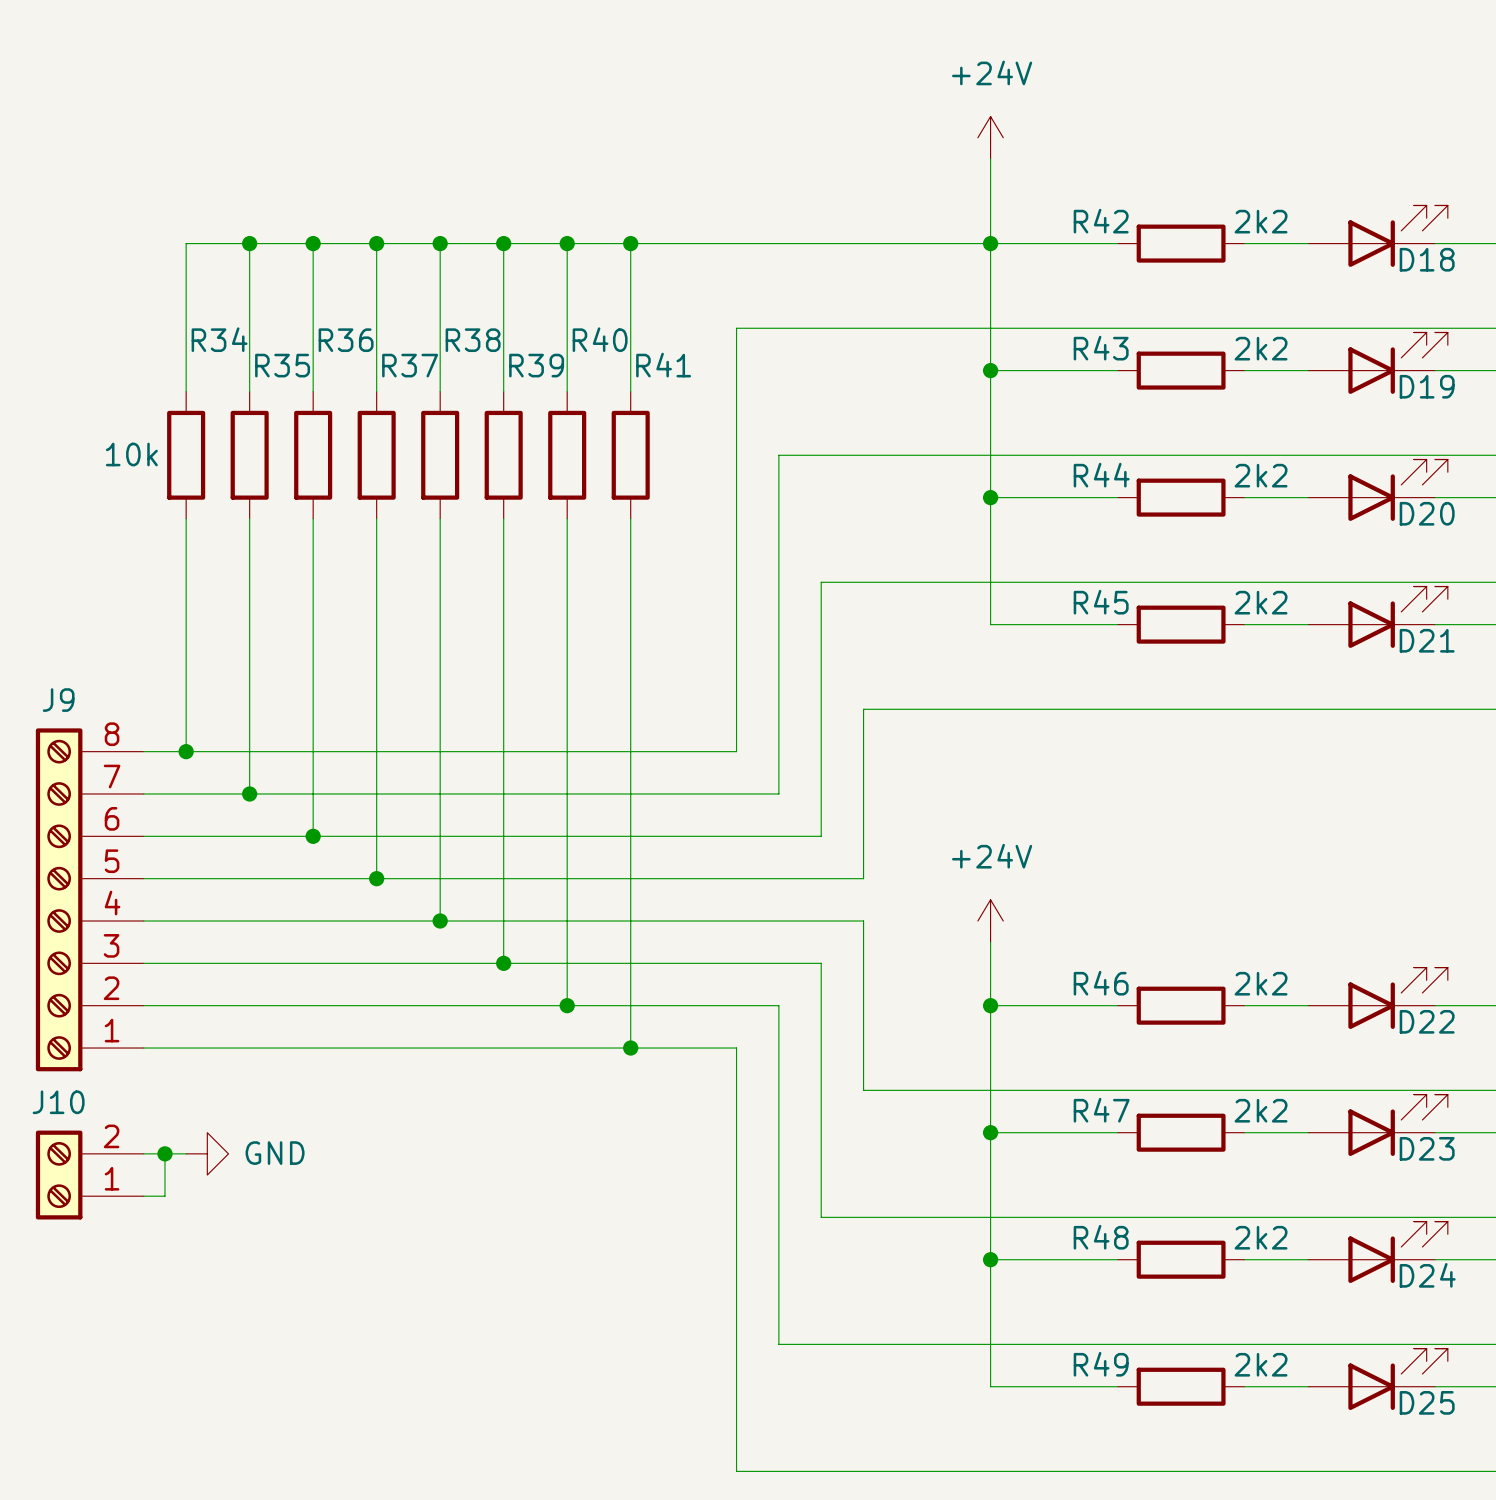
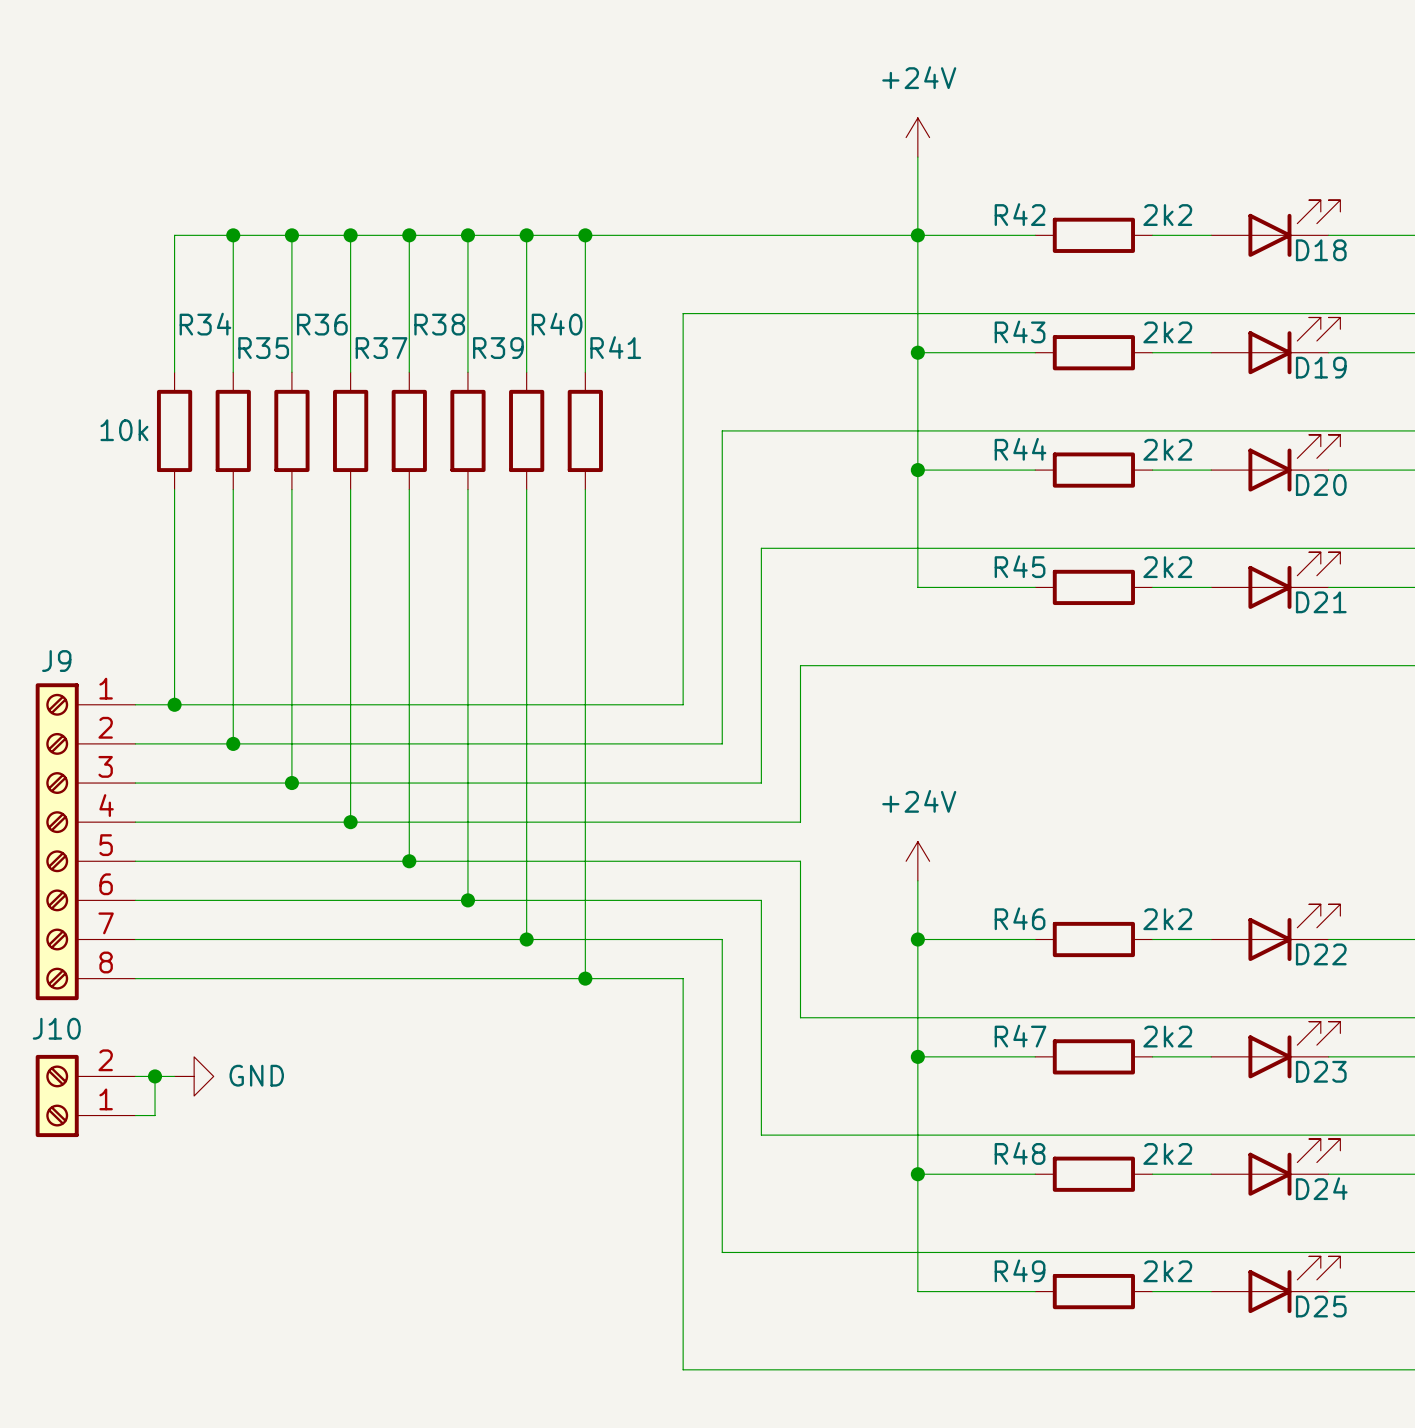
J9 flip: as is (59, 899) -> up-down (57, 841)

